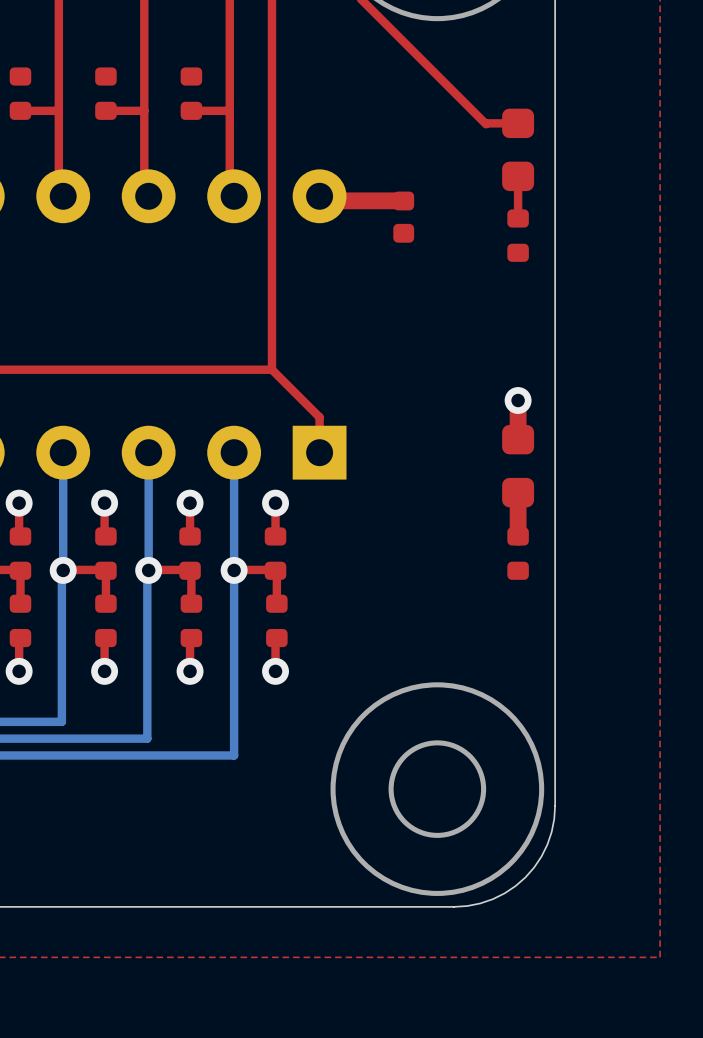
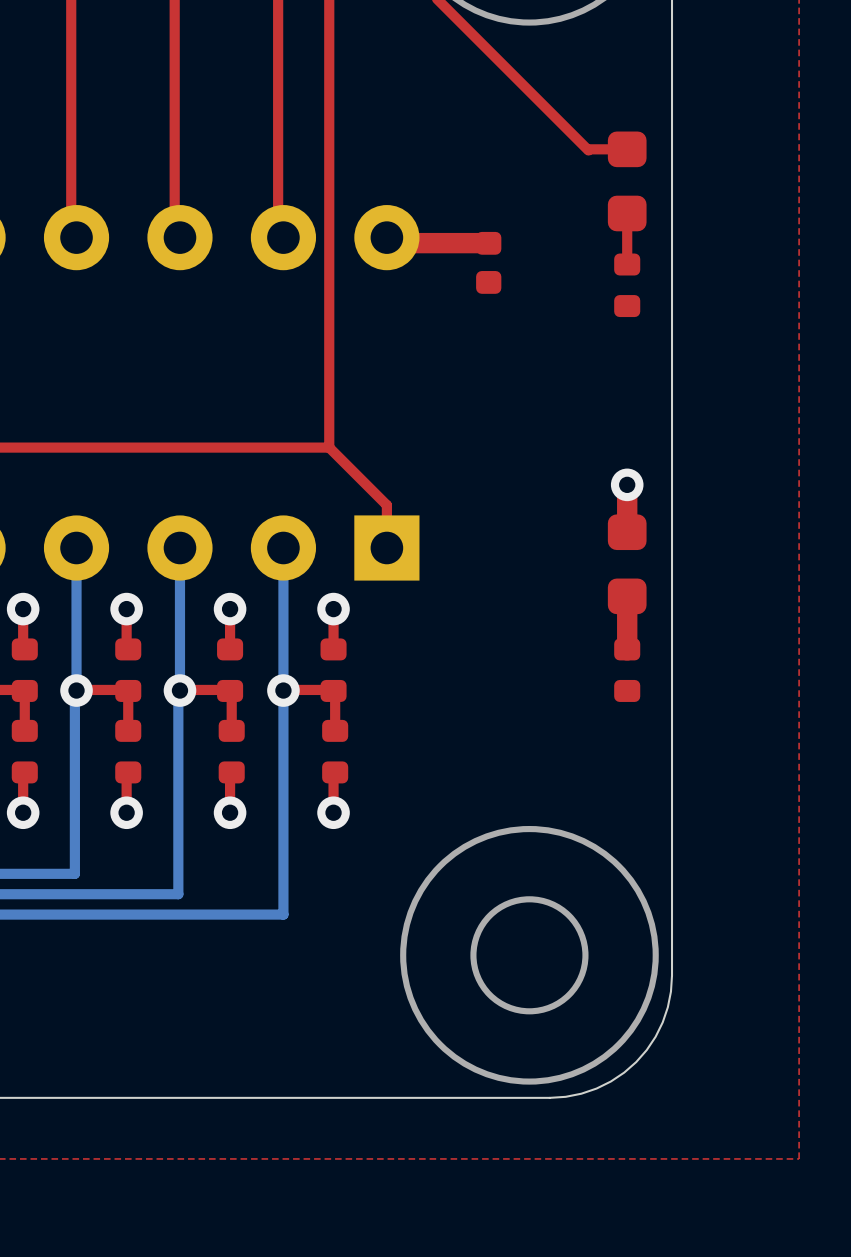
part: (20, 93) -> none
part: (105, 93) -> none
part: (191, 93) -> none
top track: (58, 110) (20, 110) -> none
top track: (144, 110) (105, 110) -> none
top track: (229, 110) (191, 110) -> none

